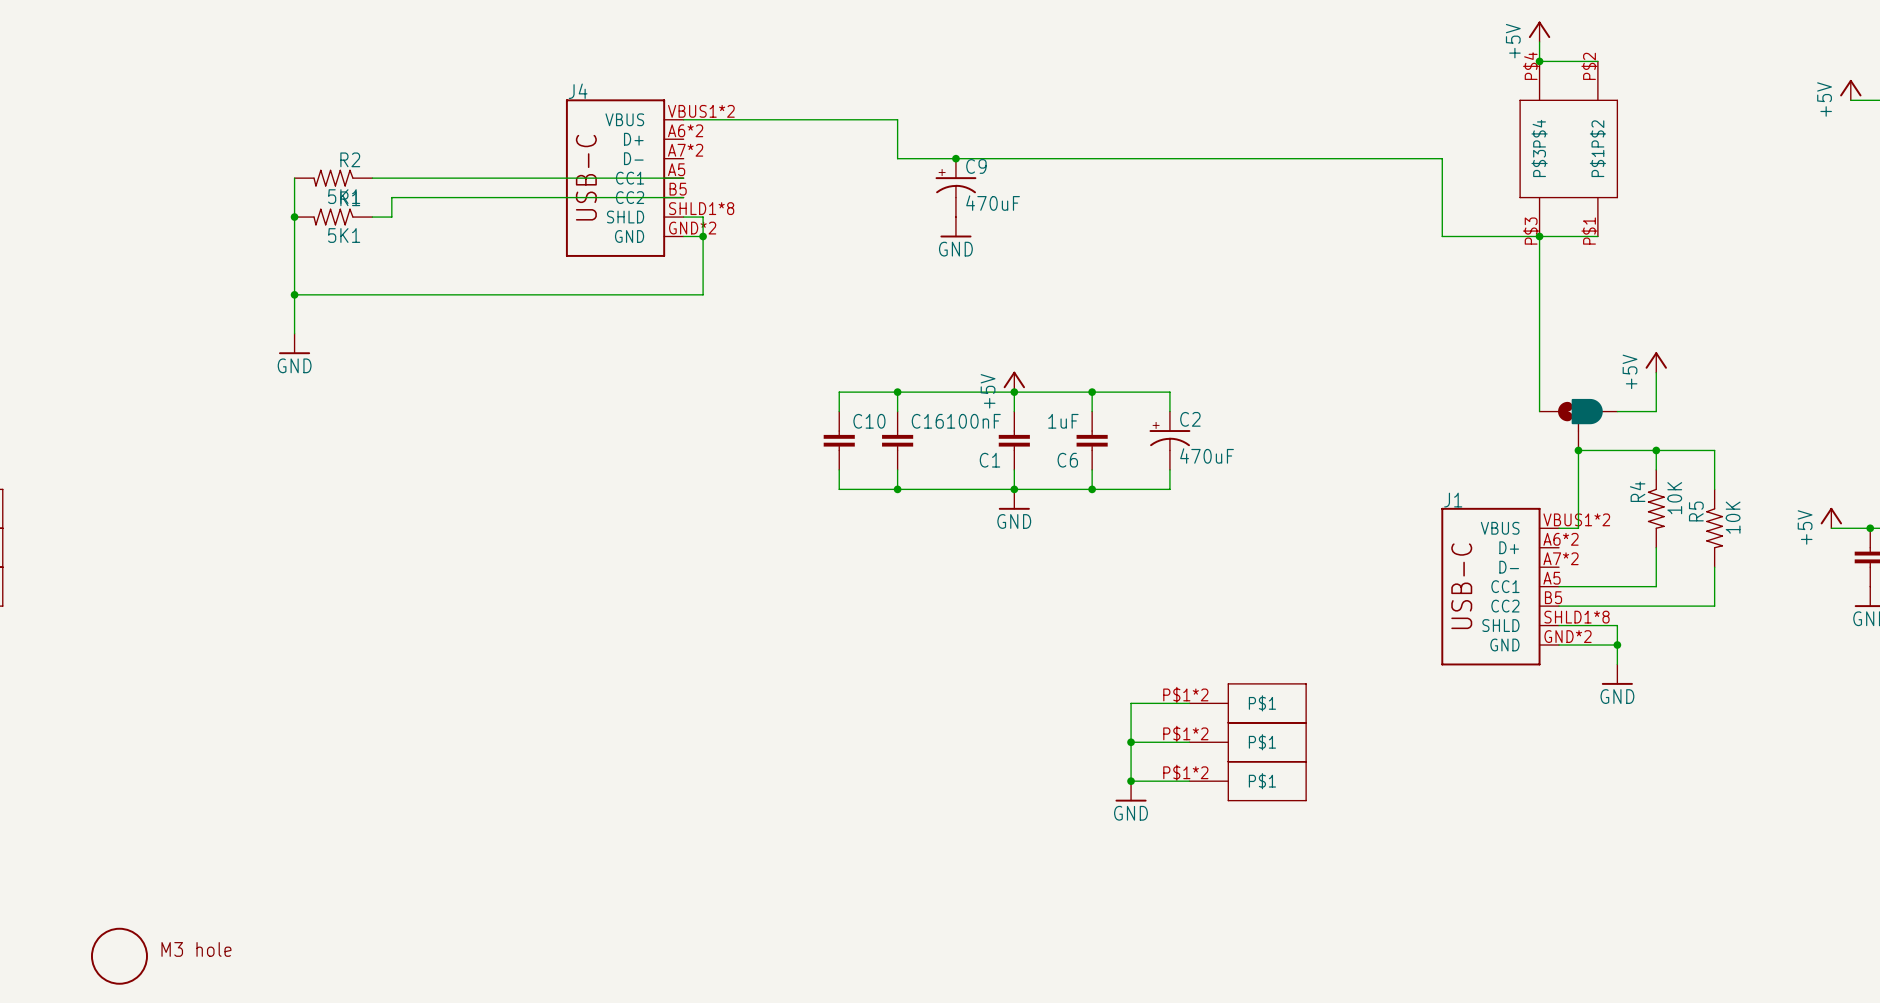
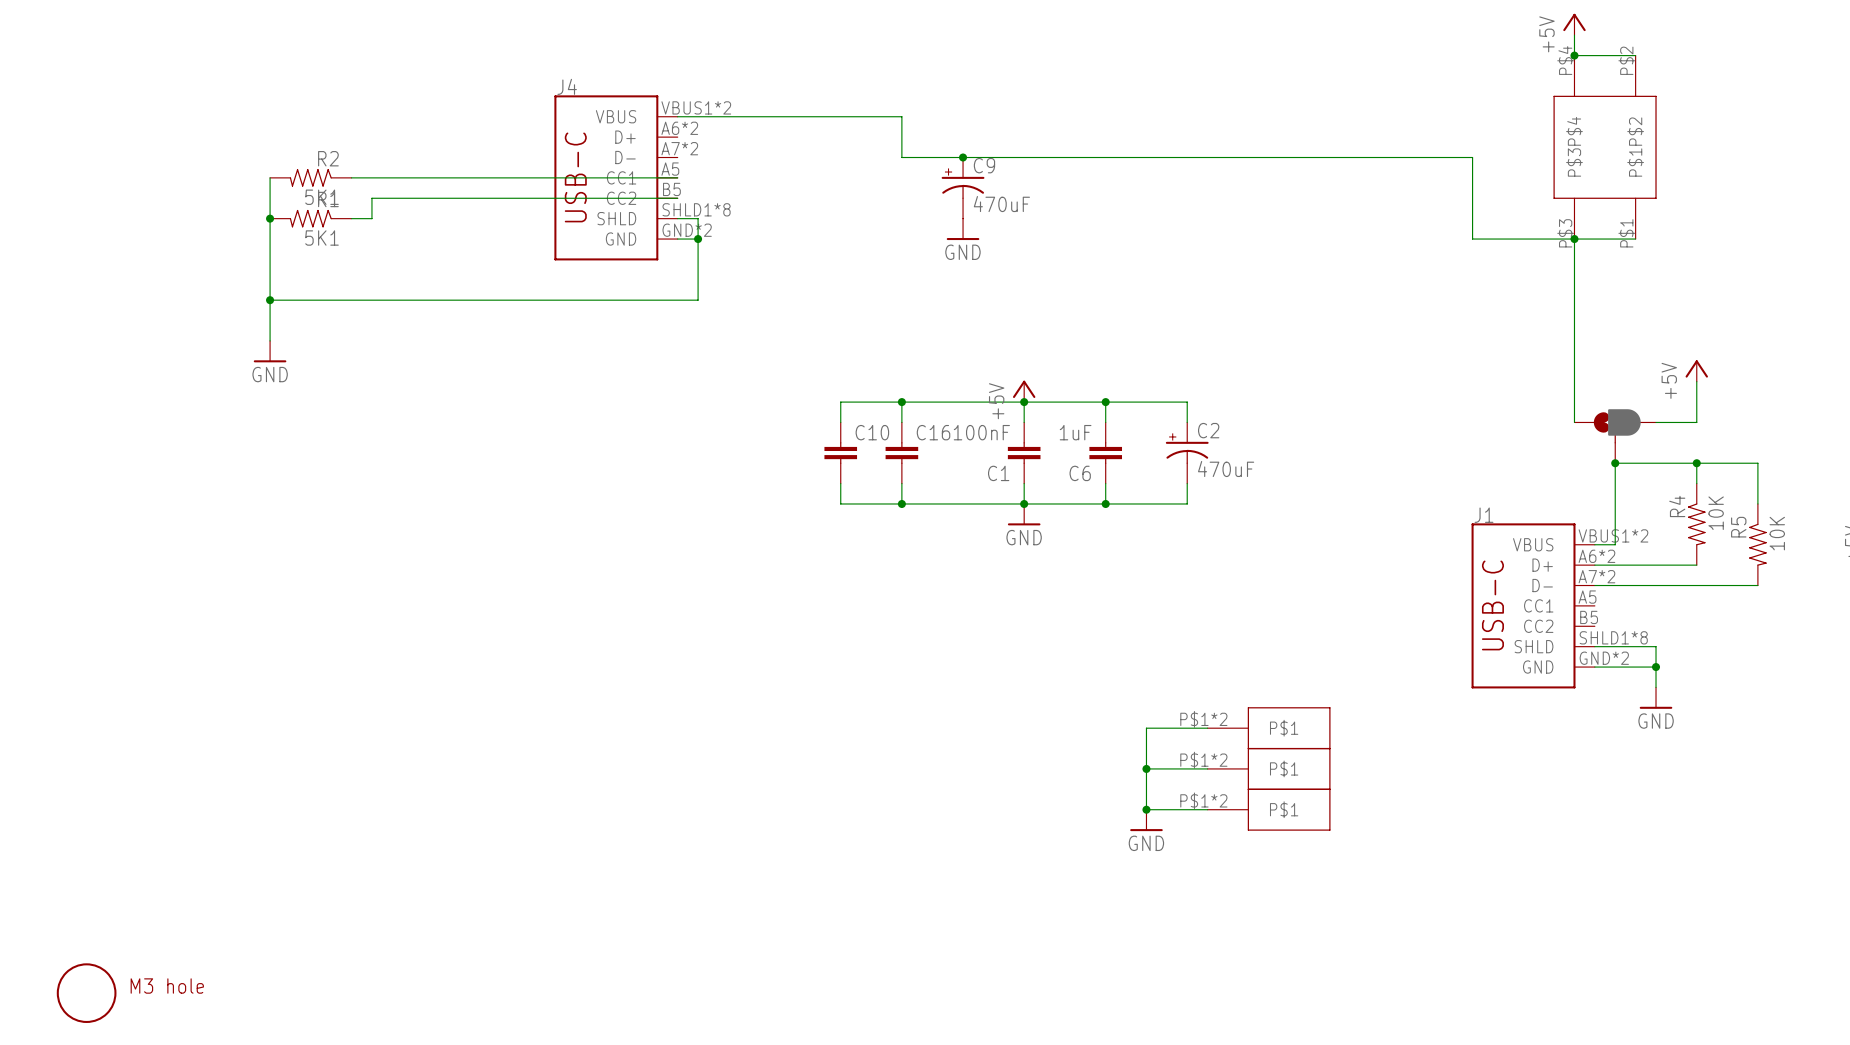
wire: (1656, 547) (1656, 586) (1559, 586) -> (1696, 565) (1594, 565)
wire: (1714, 567) (1714, 606) (1559, 606) -> (1757, 585) (1594, 585)

